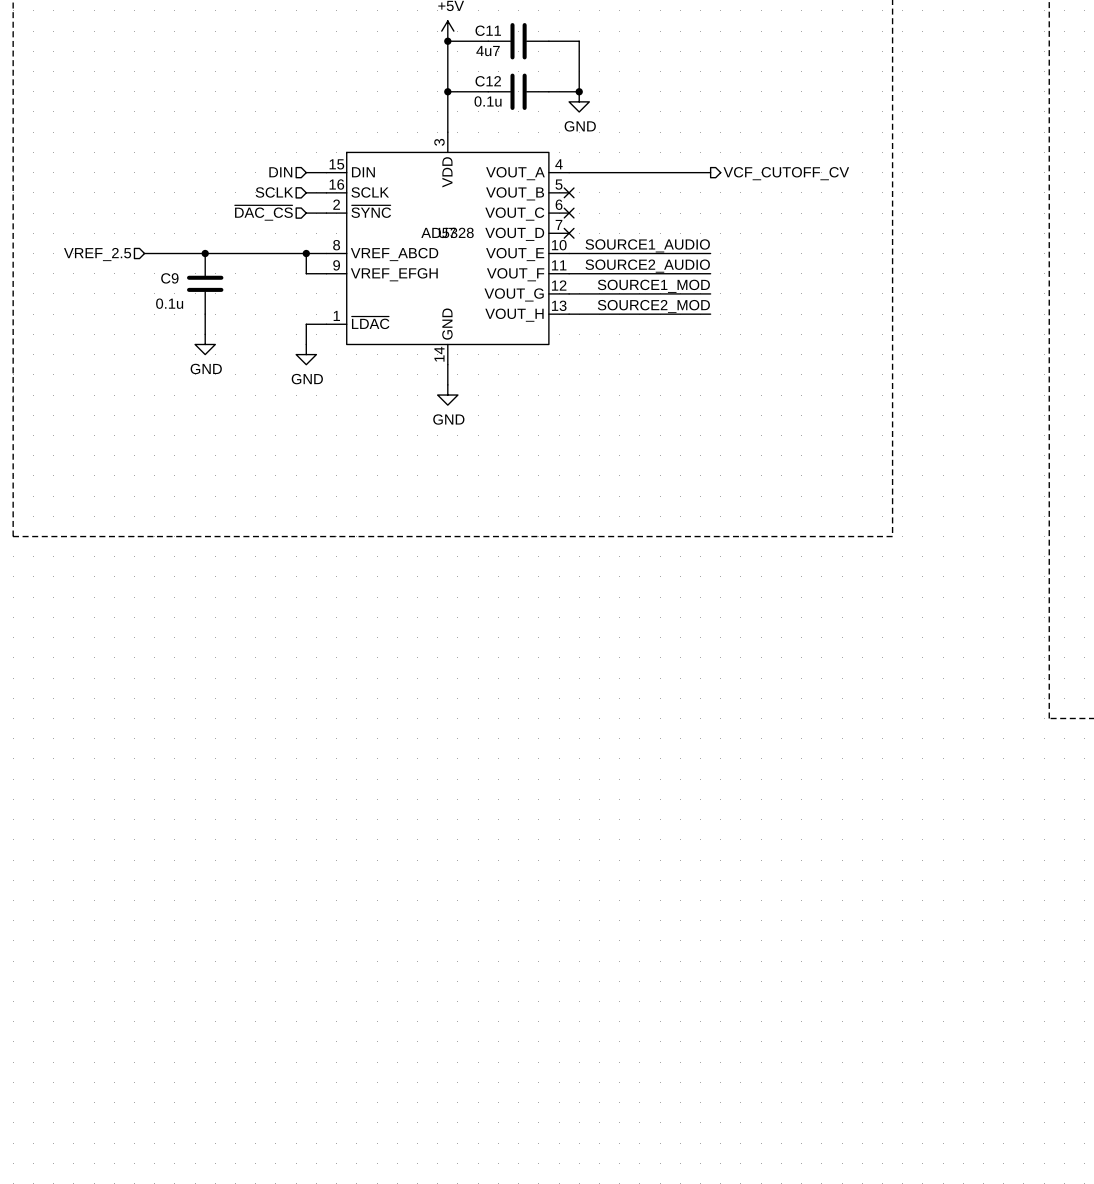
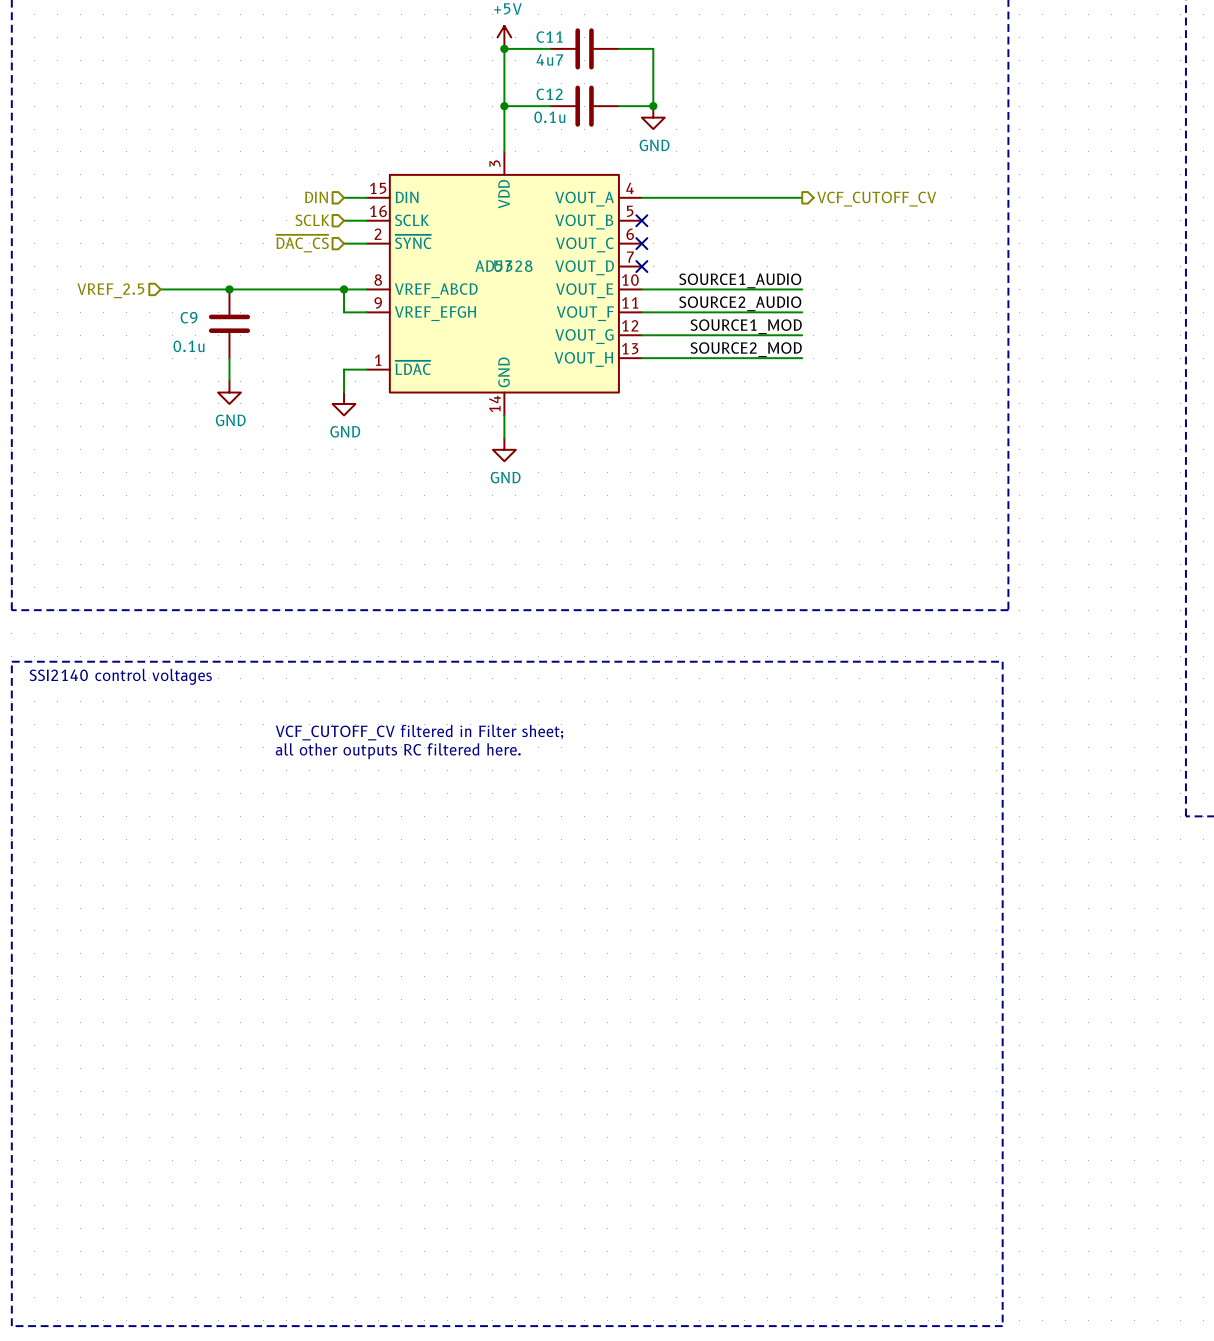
line: none -> (11, 661) (1002, 661) (1002, 1326) (11, 1326) (11, 661)
text: none -> SSI2140 control voltages (120, 676)
text: none -> VCF_CUTOFF_CV filtered in Filter sheet; (419, 732)
text: none -> all other outputs RC filtered here. (398, 751)

